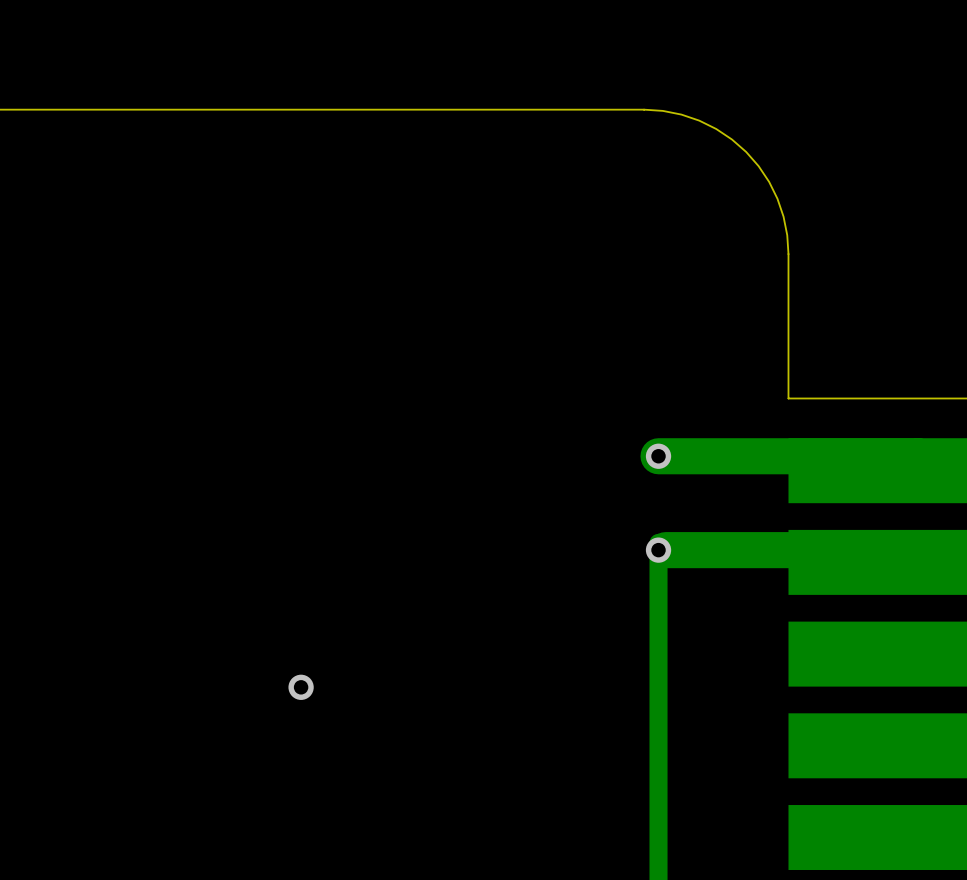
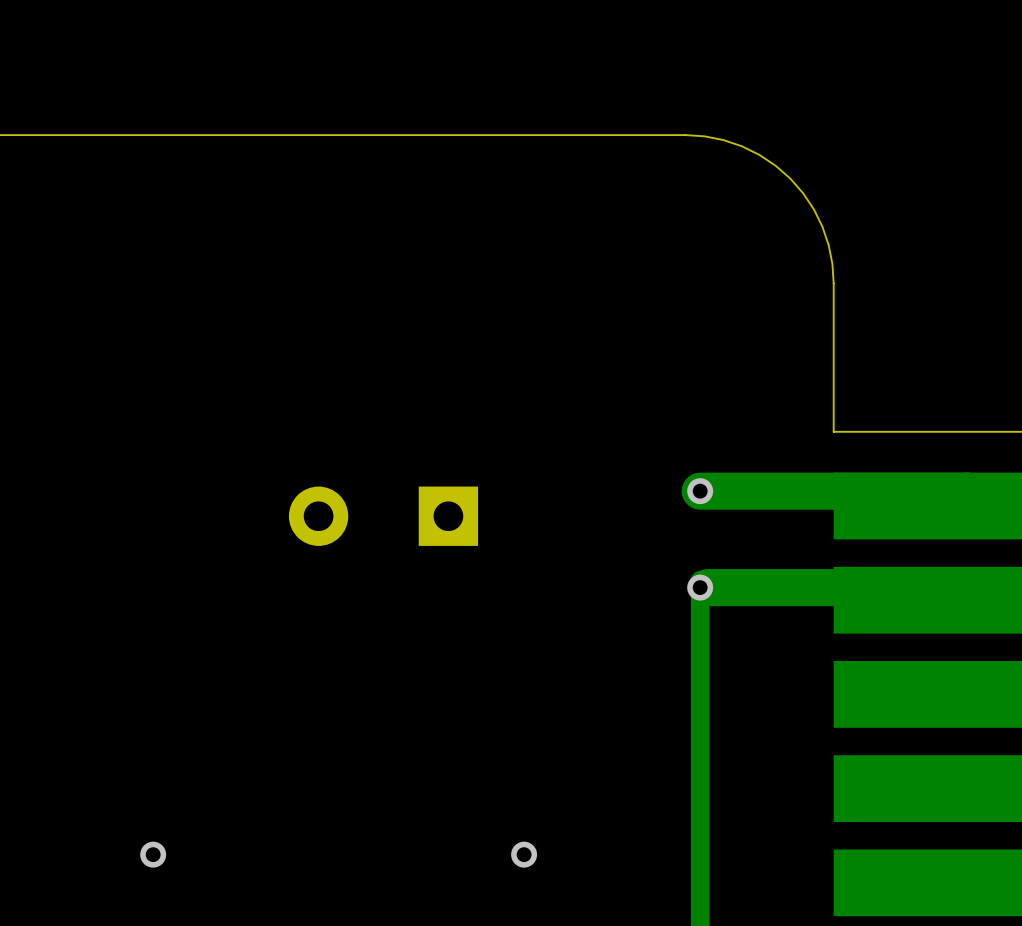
part: none -> (383, 516)
via: (301, 687) -> none
via: none -> (153, 854)
via: none -> (524, 854)

